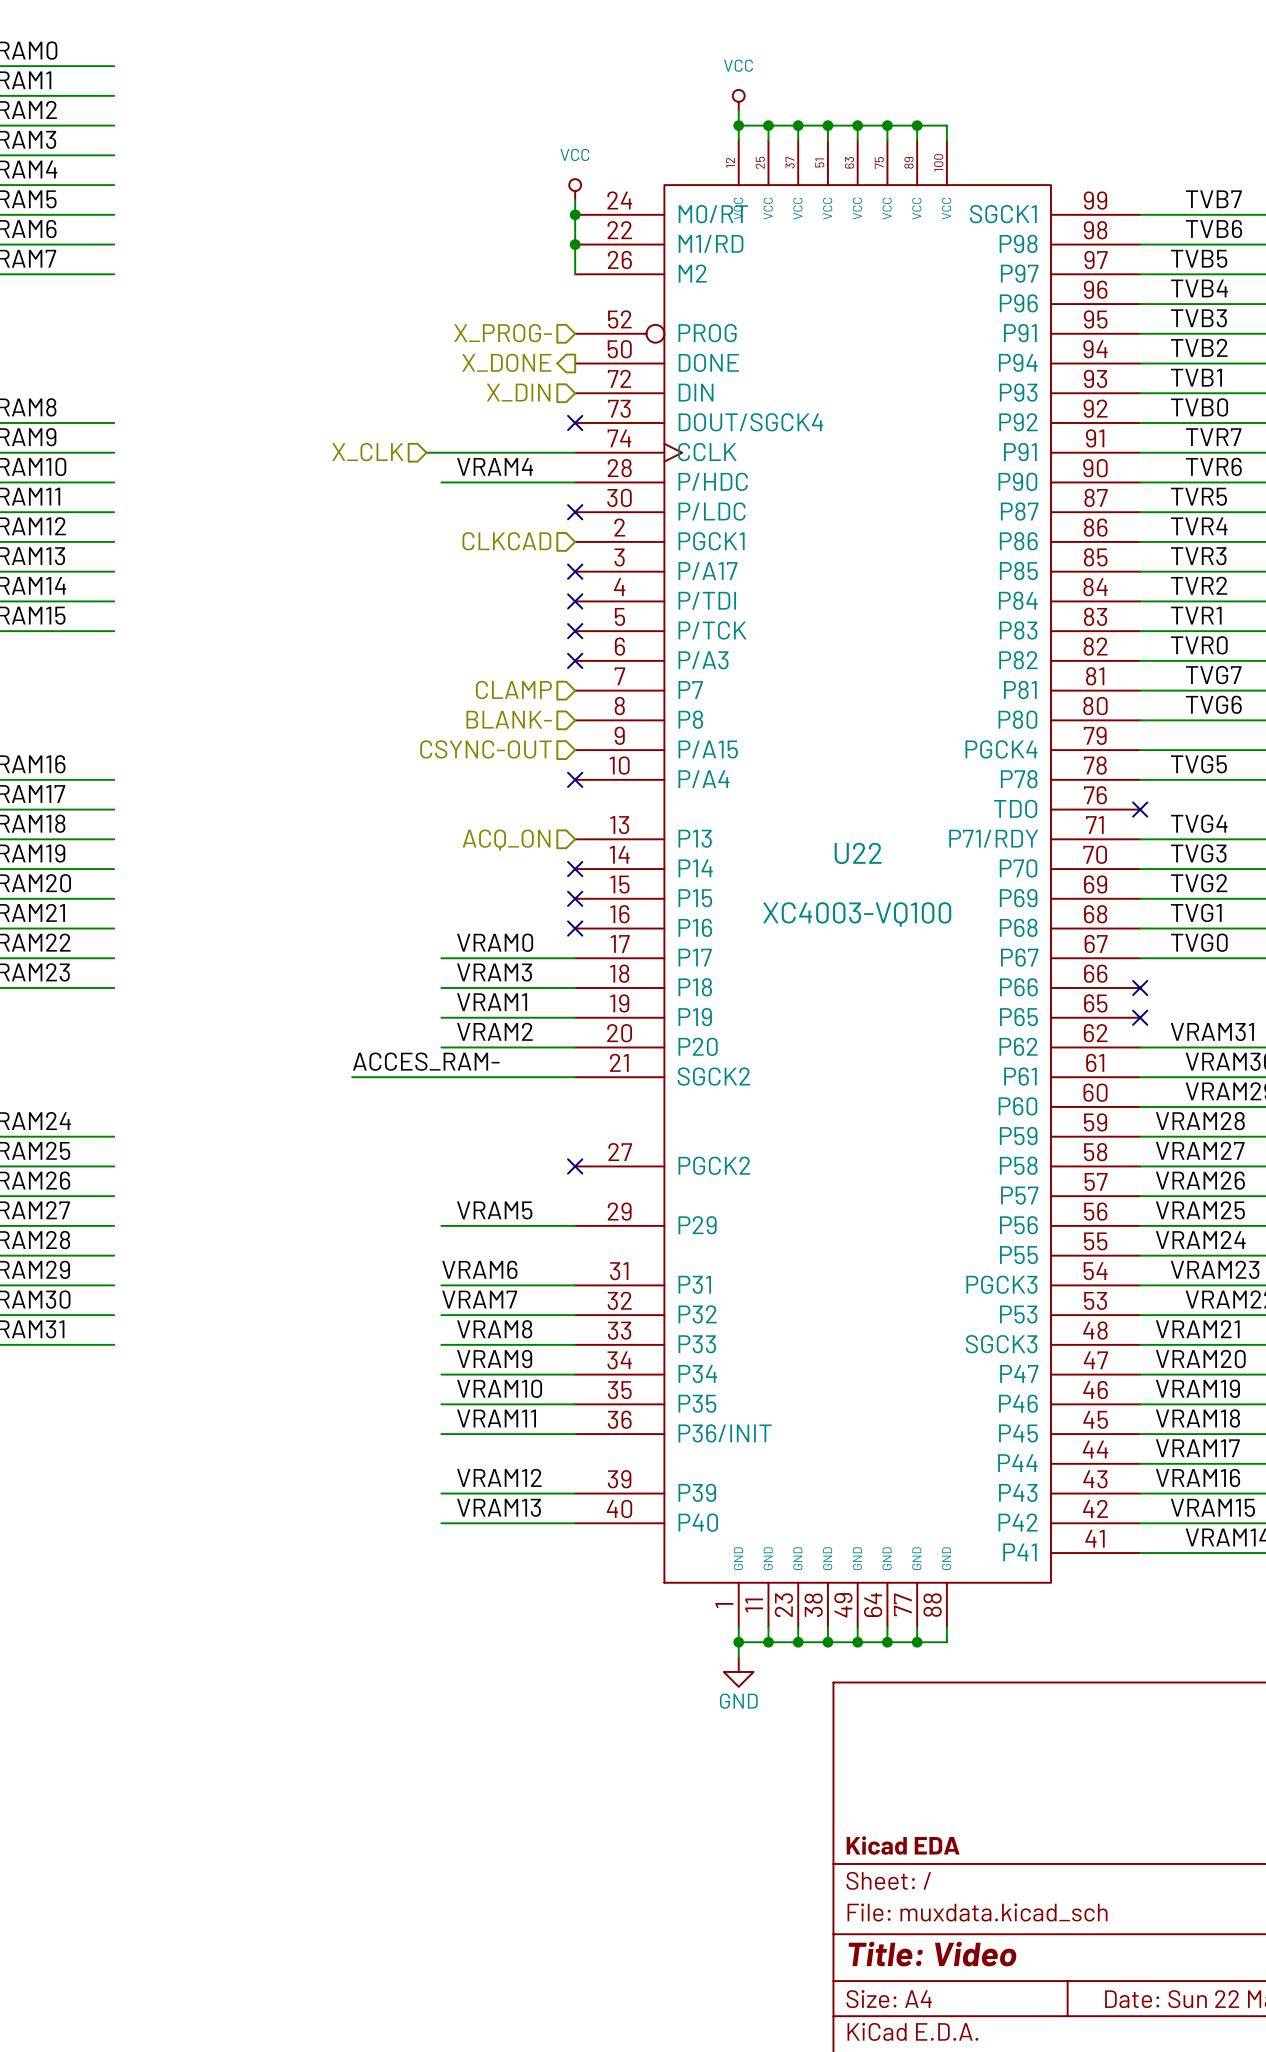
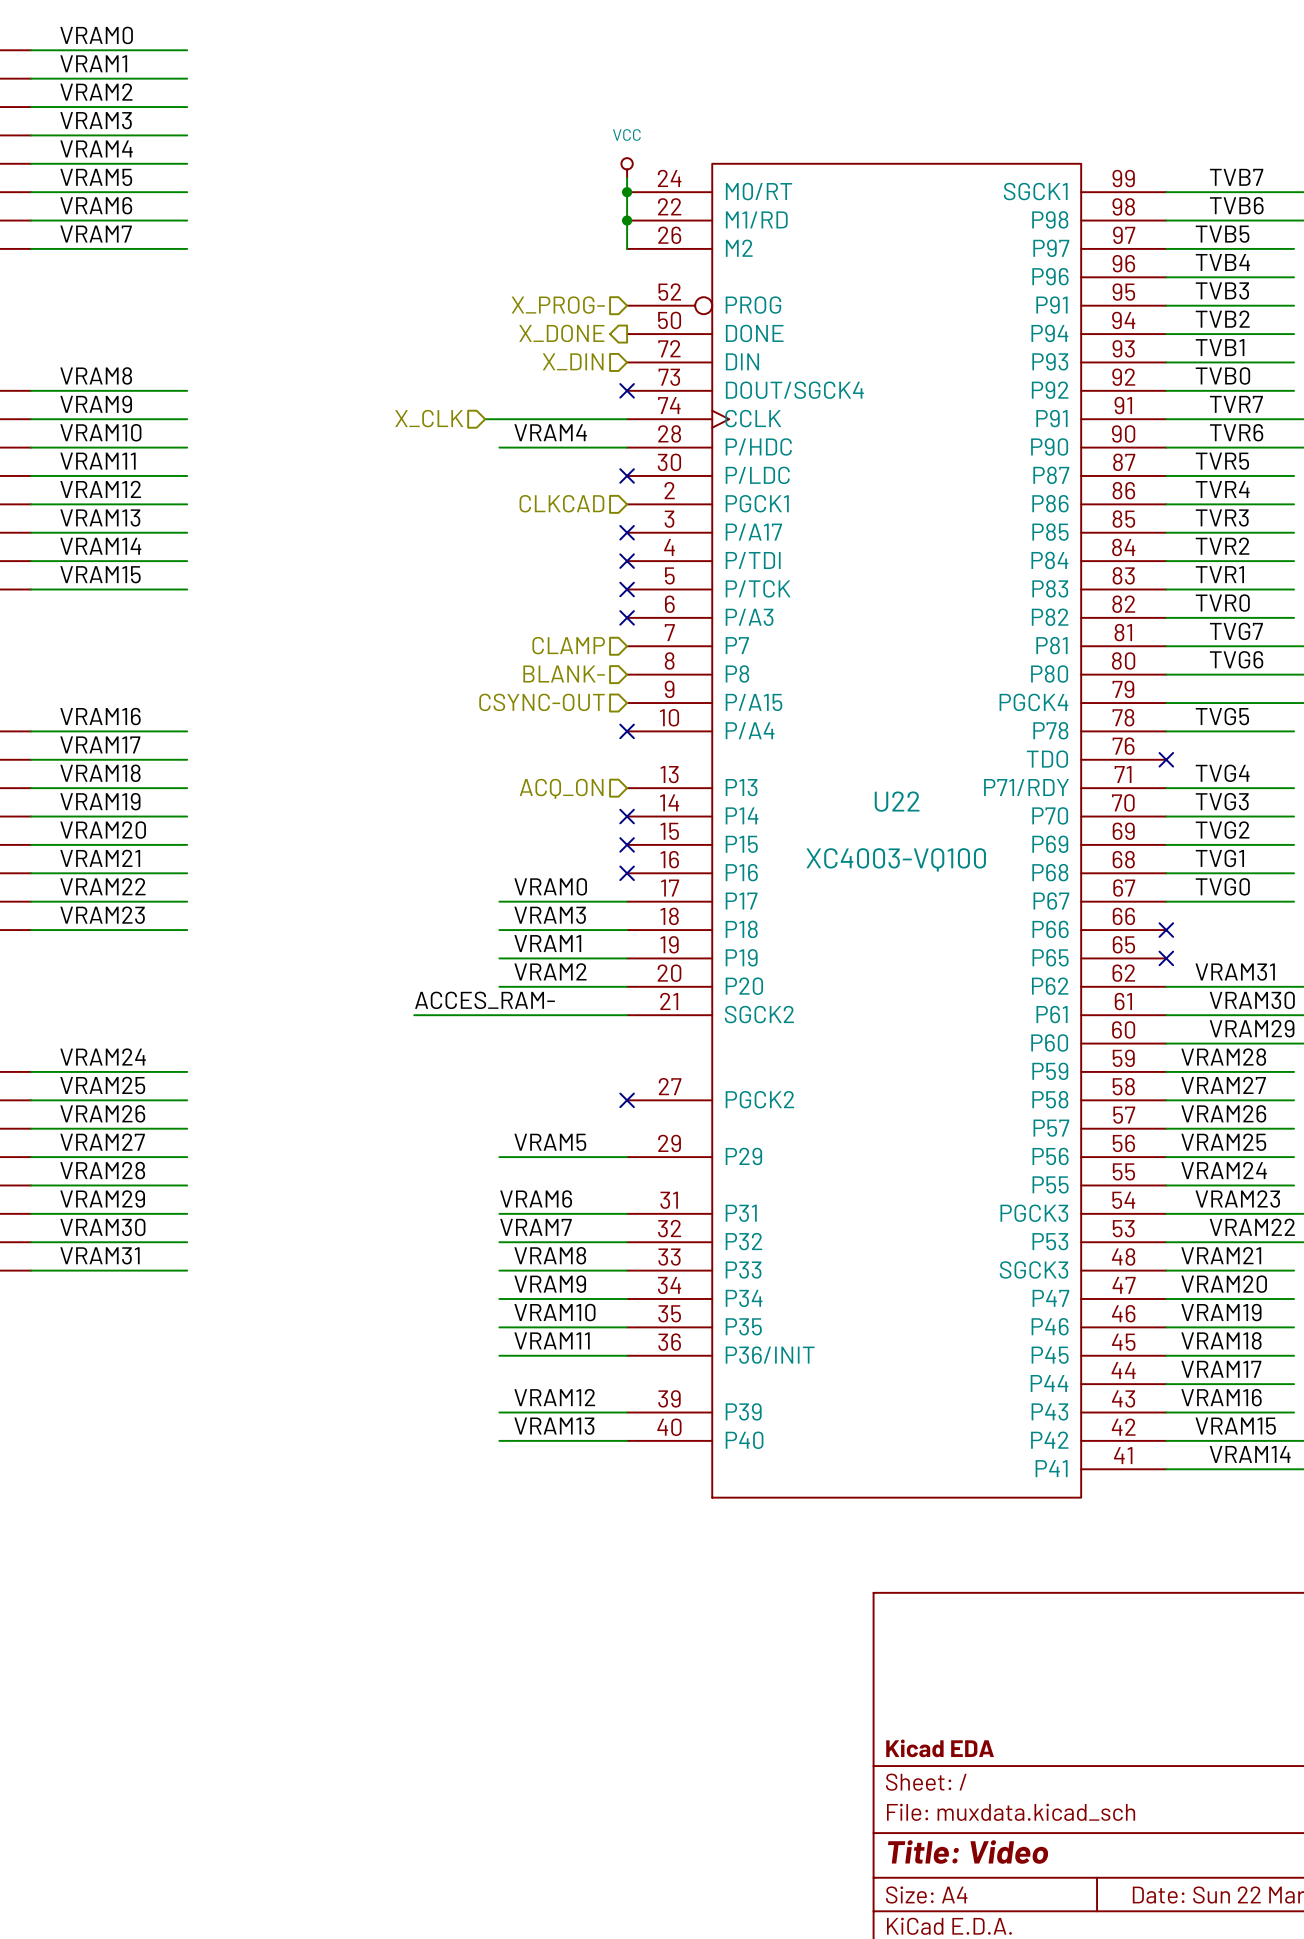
power symbol: VCC (738, 100) -> none
wire: (738, 110) (738, 140) -> none
wire: (738, 125) (946, 125) (946, 140) -> none
junction: (738, 125) -> none
wire: (768, 125) (768, 140) -> none
junction: (768, 125) -> none
wire: (798, 125) (798, 140) -> none
junction: (798, 125) -> none
wire: (827, 125) (827, 140) -> none
junction: (827, 125) -> none
wire: (857, 125) (857, 140) -> none
junction: (857, 125) -> none
wire: (887, 125) (887, 140) -> none
junction: (887, 125) -> none
wire: (917, 125) (917, 140) -> none
junction: (917, 125) -> none
U22 symbol: [575, 140, 1141, 1628] -> [627, 163, 1167, 1498]
wire: (738, 1627) (738, 1657) -> none
wire: (768, 1627) (768, 1642) -> none
wire: (798, 1627) (798, 1642) -> none
wire: (827, 1627) (827, 1642) -> none
wire: (857, 1627) (857, 1642) -> none
wire: (887, 1627) (887, 1642) -> none
wire: (917, 1627) (917, 1642) -> none
wire: (946, 1627) (946, 1642) (738, 1642) -> none
junction: (738, 1642) -> none
junction: (768, 1642) -> none
junction: (798, 1642) -> none
junction: (827, 1642) -> none
junction: (857, 1642) -> none
junction: (887, 1642) -> none
junction: (917, 1642) -> none
power symbol: GND (738, 1671) -> none

